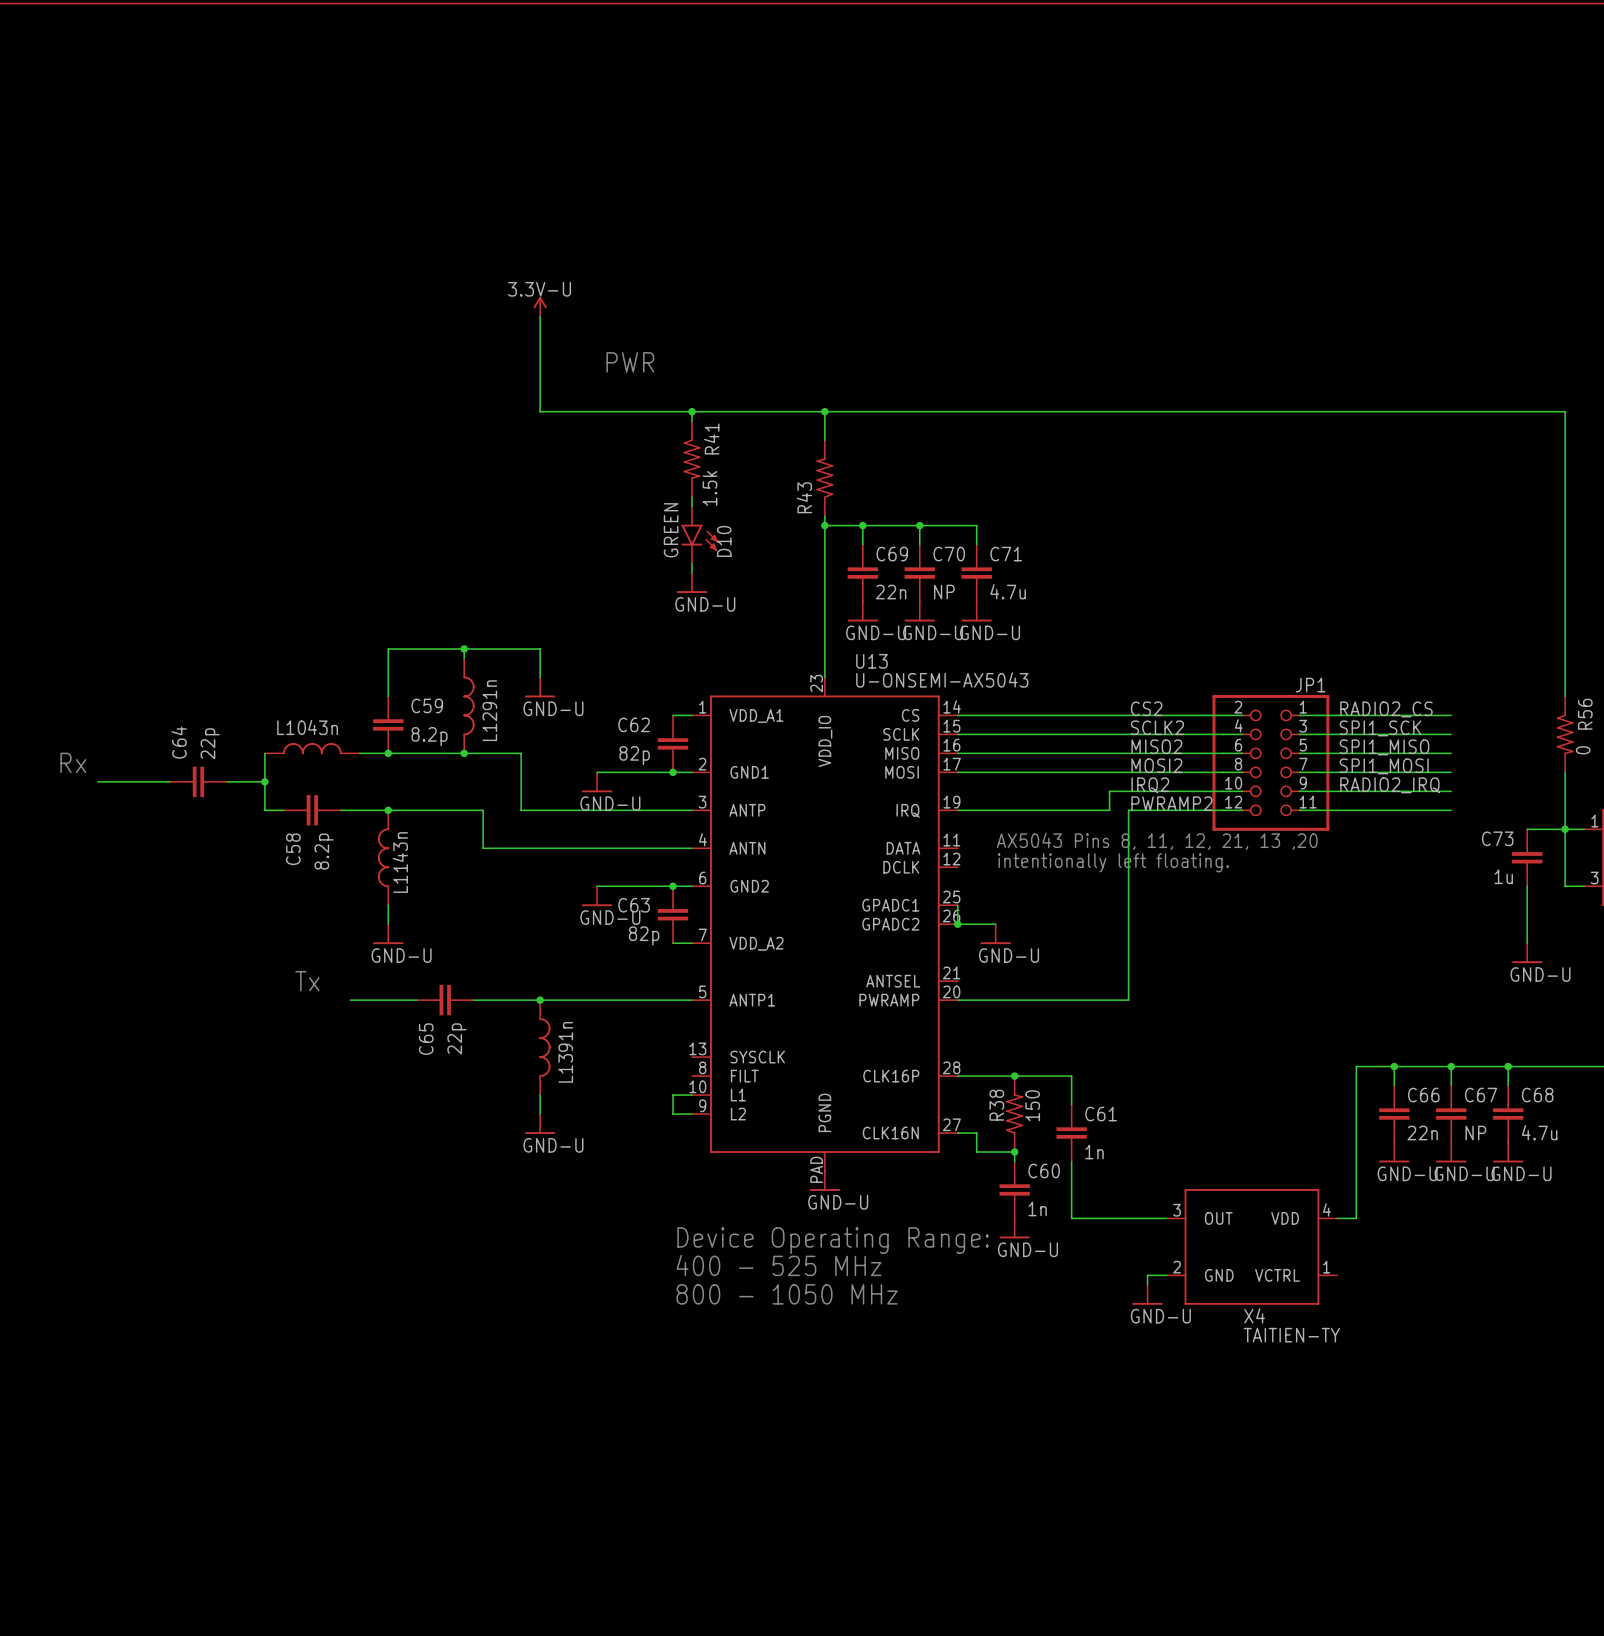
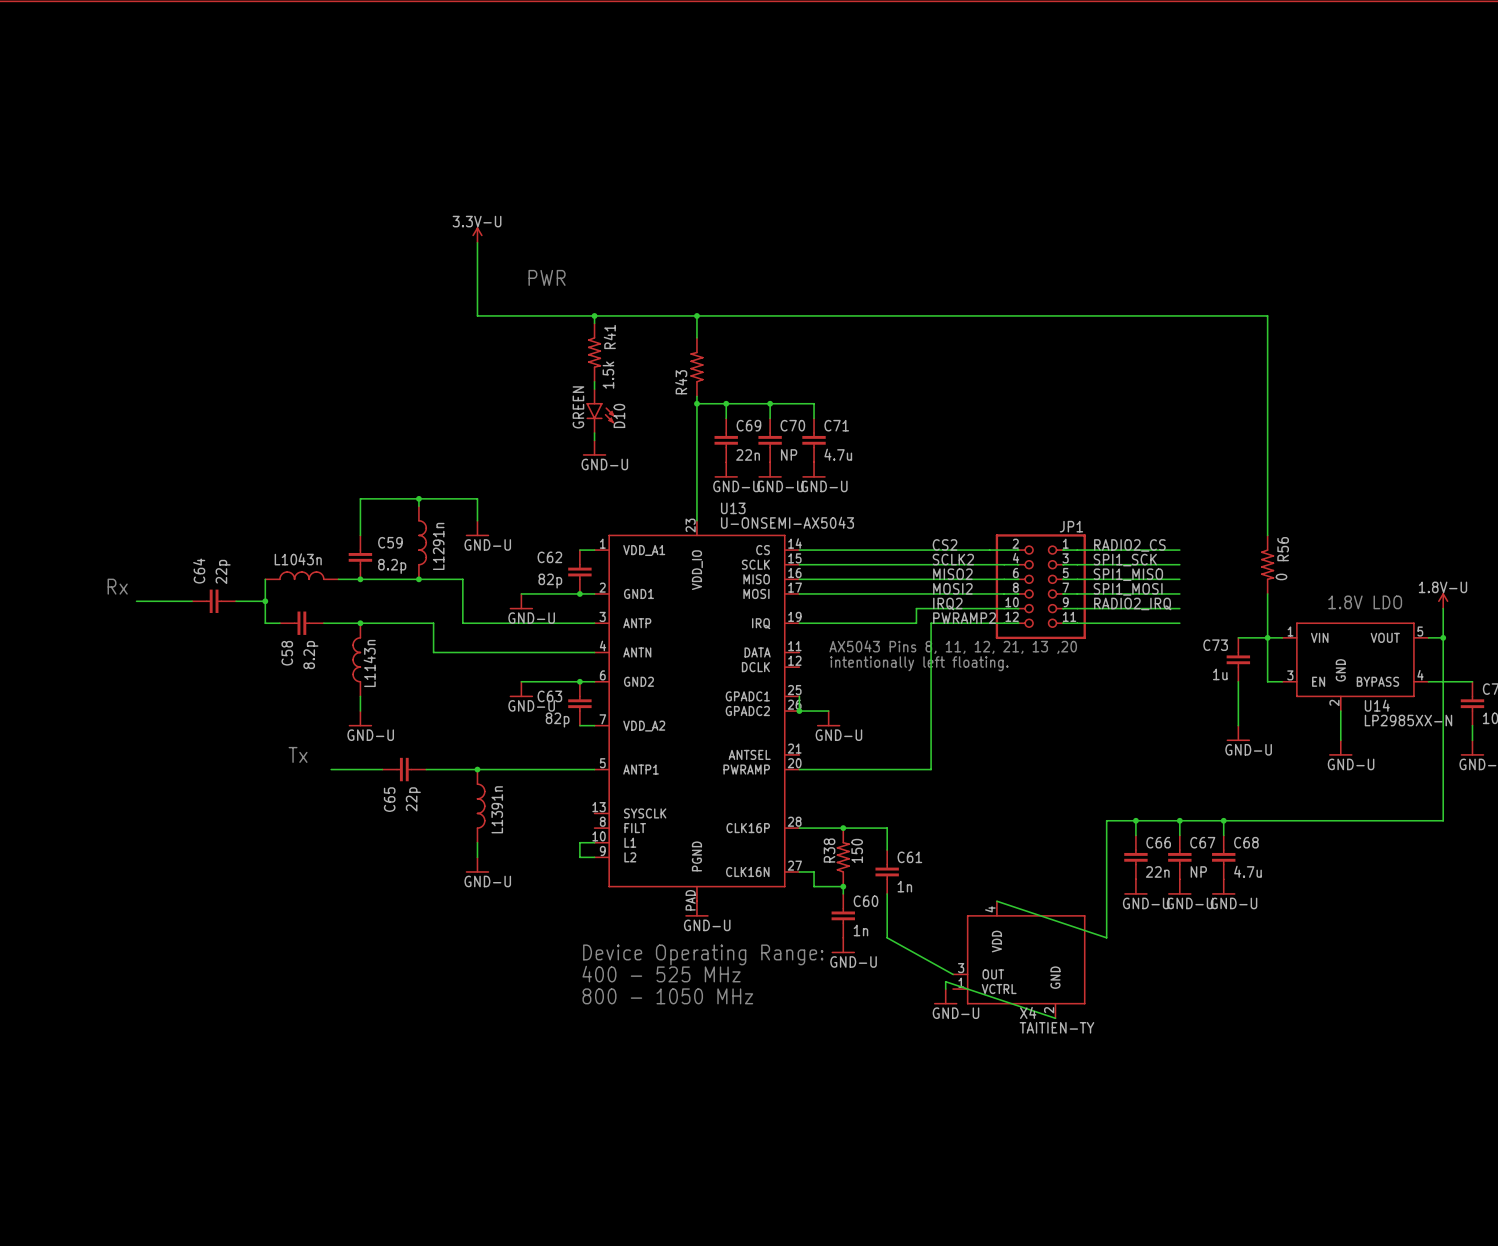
X4 symbol: [1166, 1189, 1338, 1305] -> [953, 901, 1086, 1019]
wire: (1071, 1218) (1166, 1218) -> (887, 937) (953, 974)
wire: (1337, 1218) (1356, 1218) -> (996, 901) (1106, 937)
wire: (1147, 1275) (1166, 1275) -> (945, 981) (1055, 1018)

